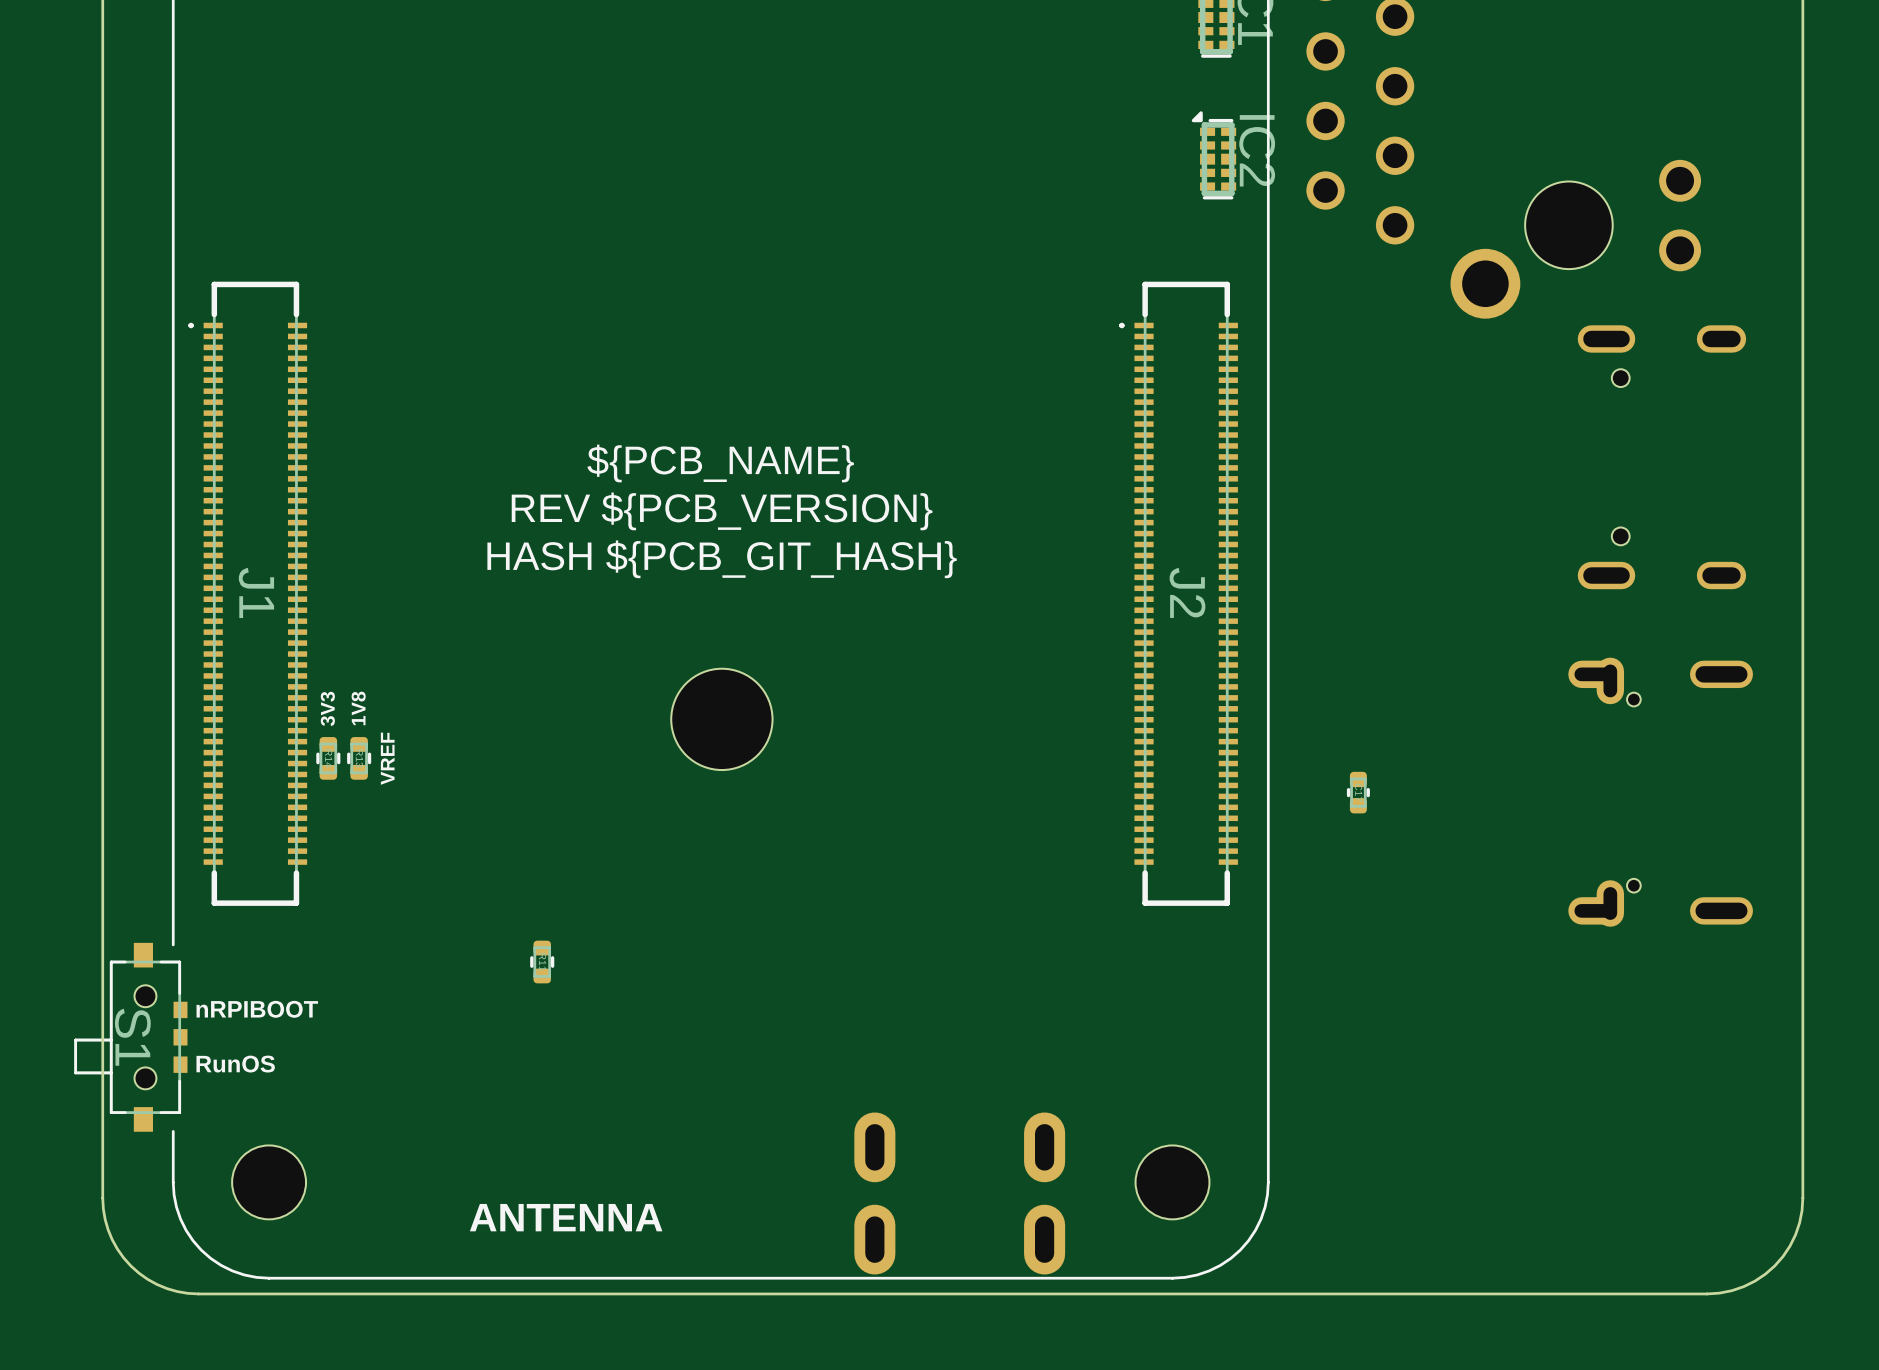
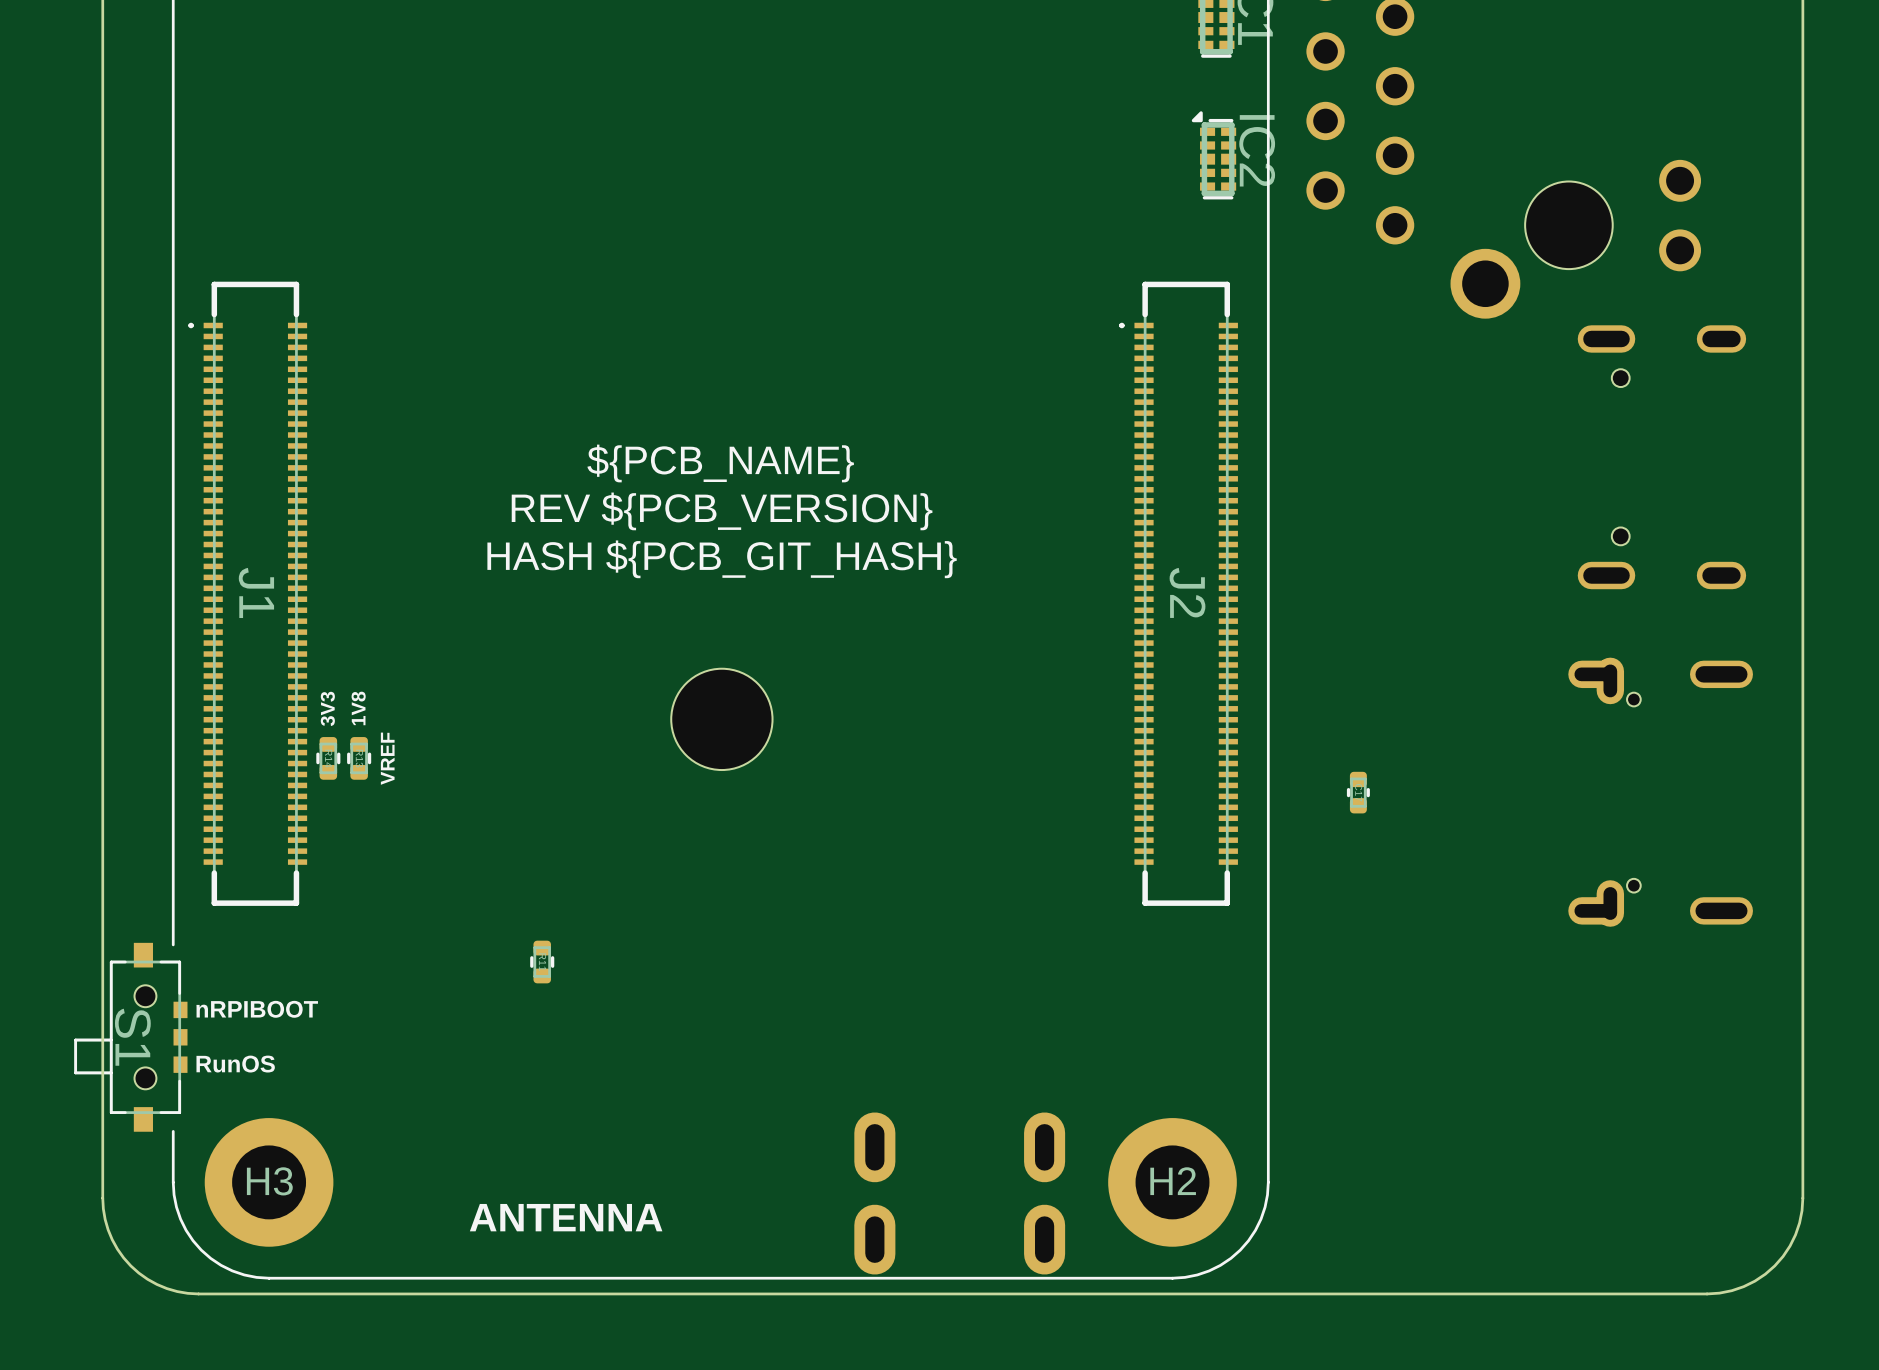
part: (269, 1182) -> none
H3: none -> (269, 1182)
part: (1172, 1182) -> none
H2: none -> (1172, 1182)

